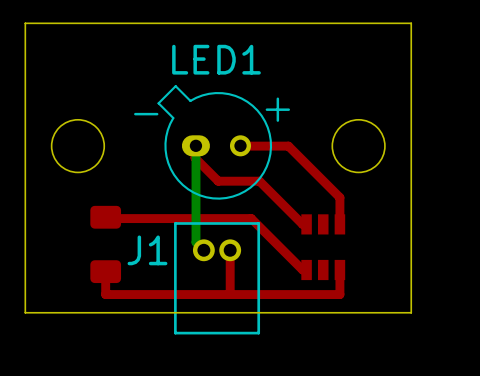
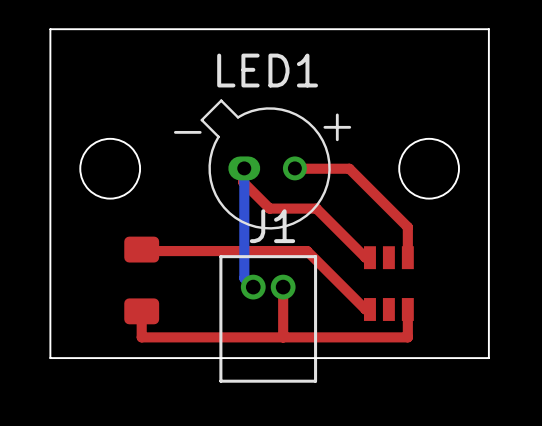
J1 name position: J1 (147, 250) -> J1 (272, 226)

